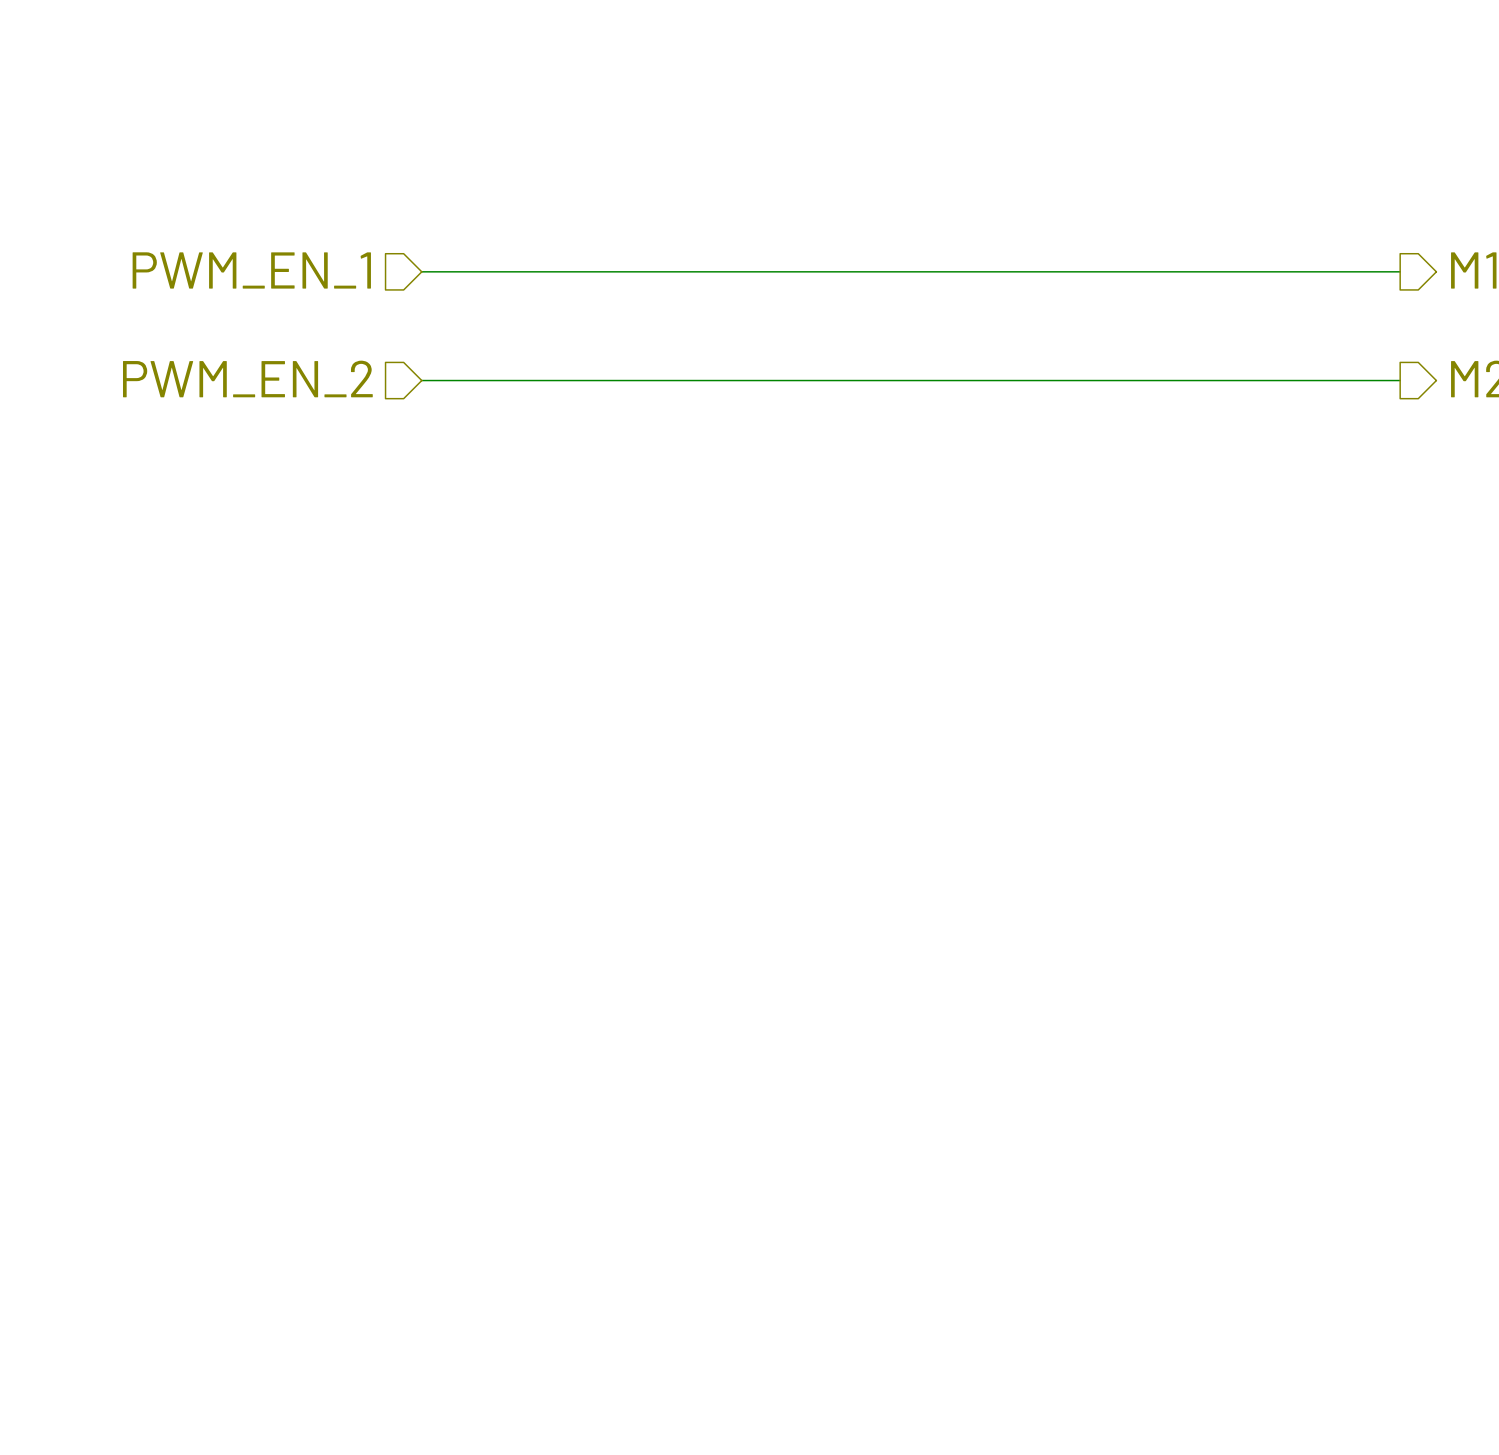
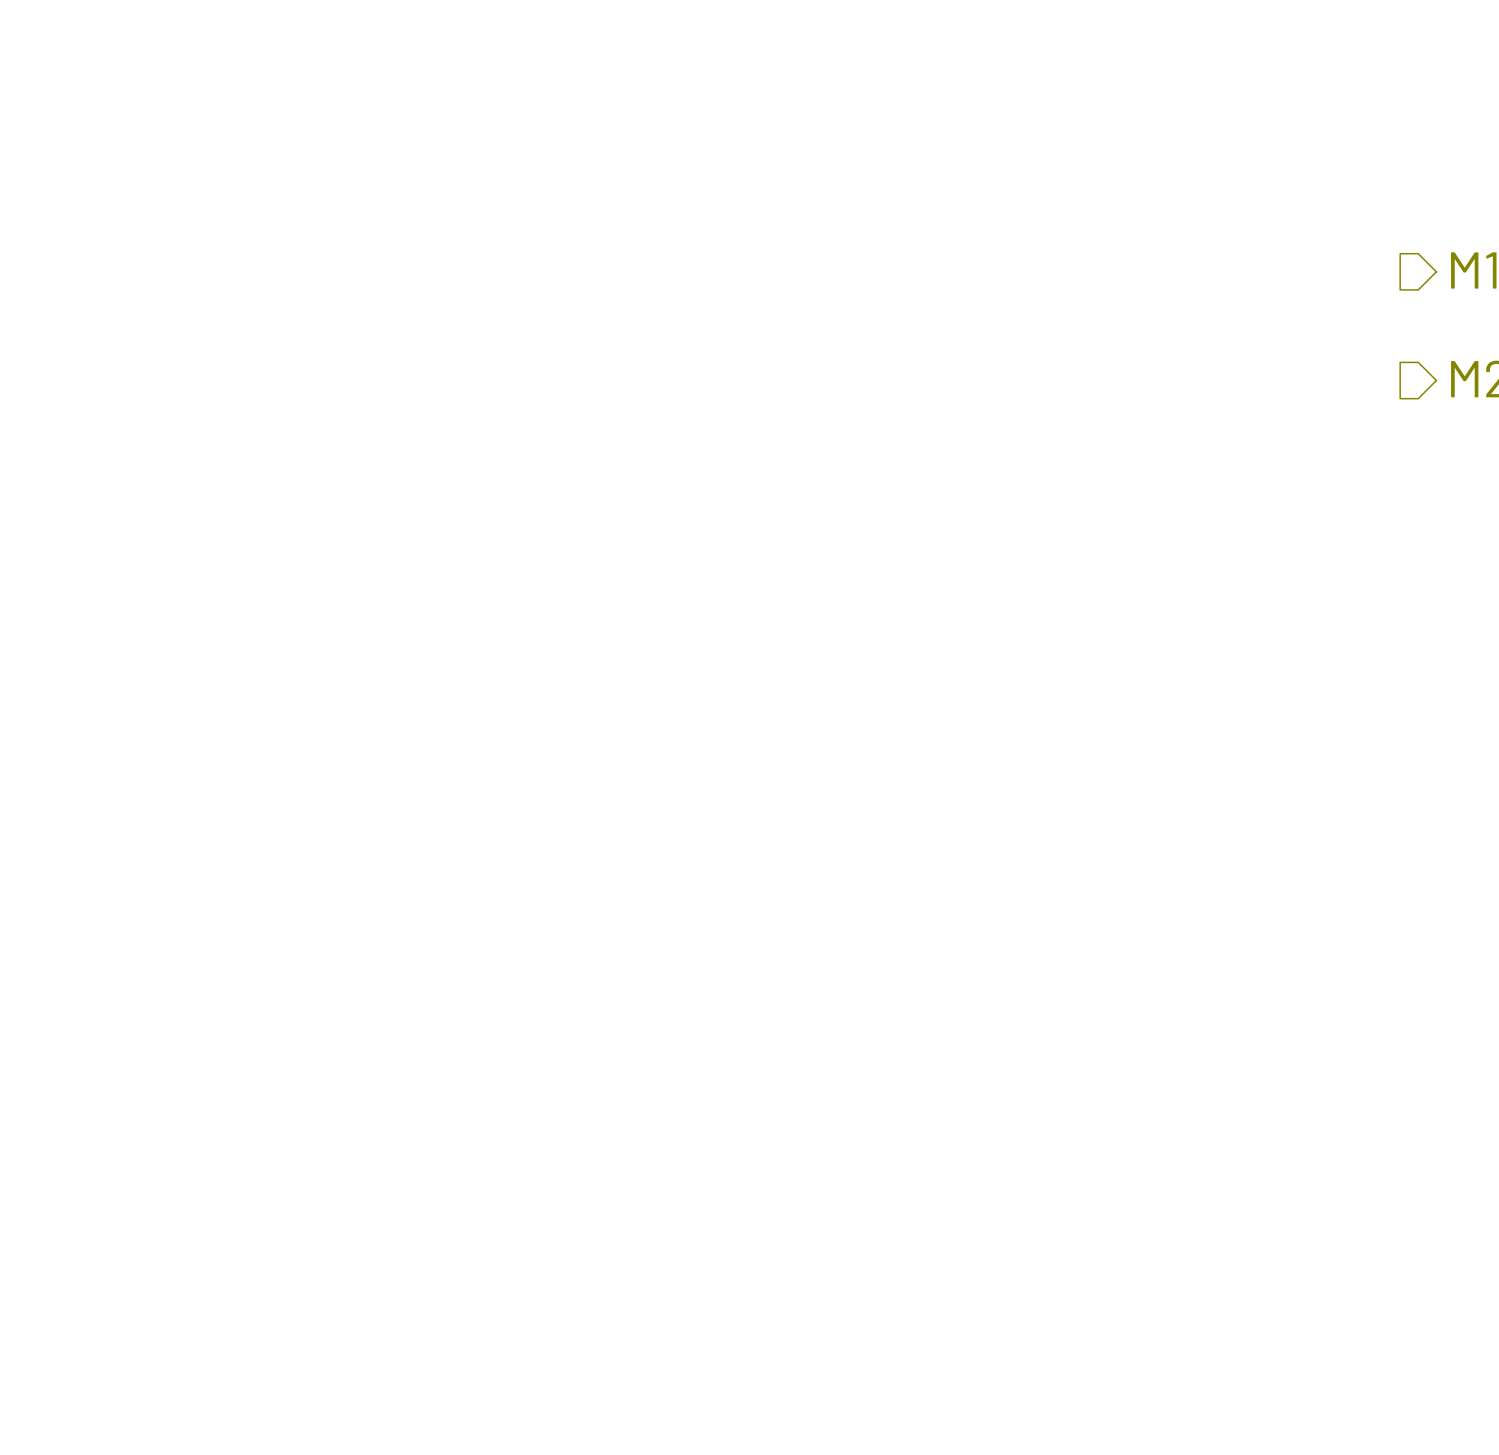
hierarchical label: PWM_EN_1 (251, 270) -> none
wire: (421, 271) (1400, 271) -> none
hierarchical label: PWM_EN_2 (247, 378) -> none
wire: (421, 380) (1400, 380) -> none

